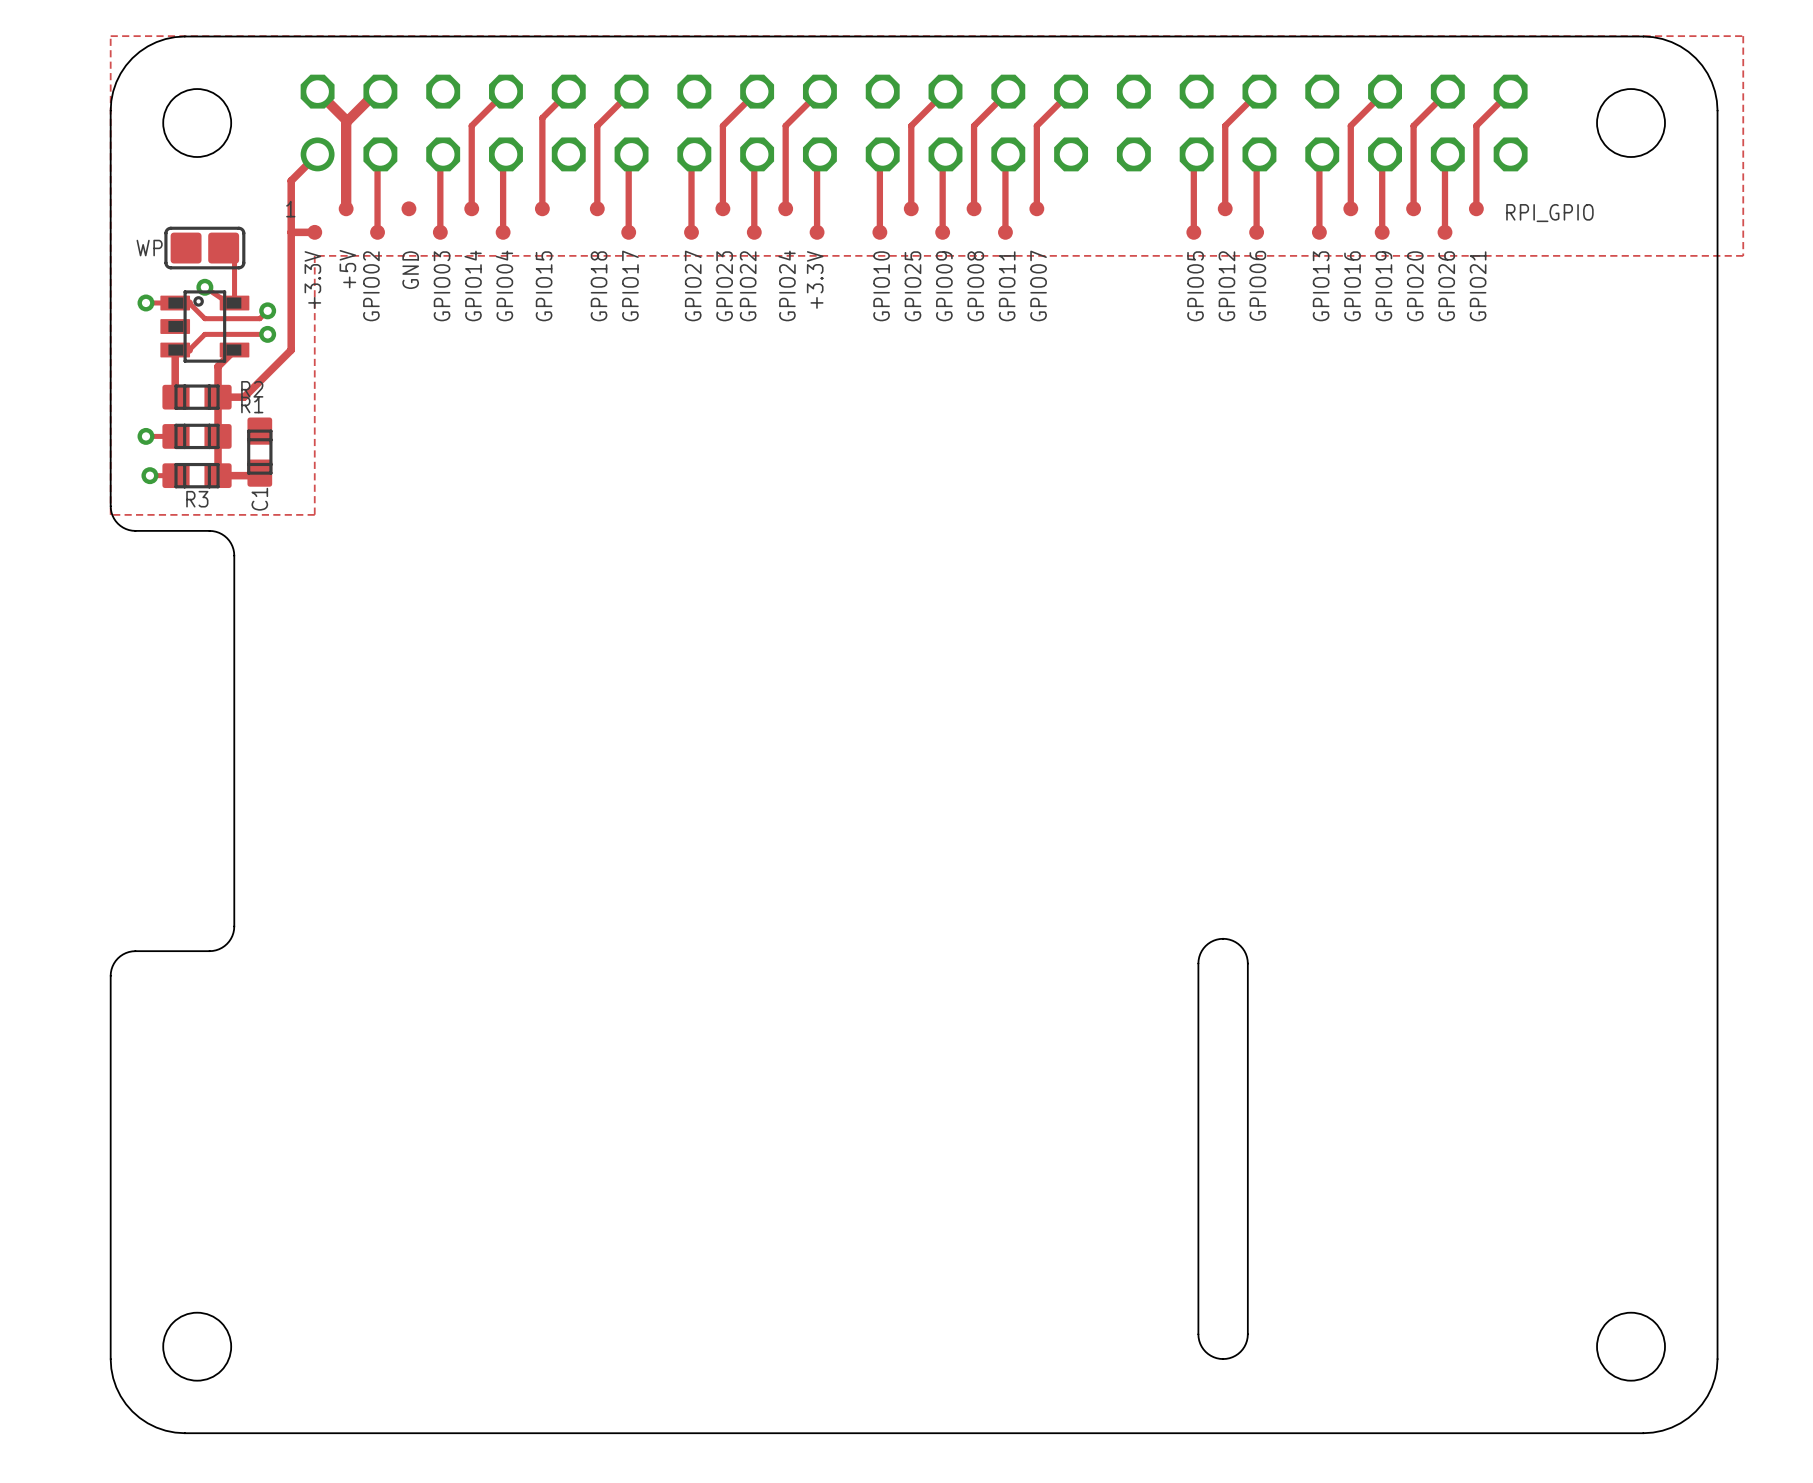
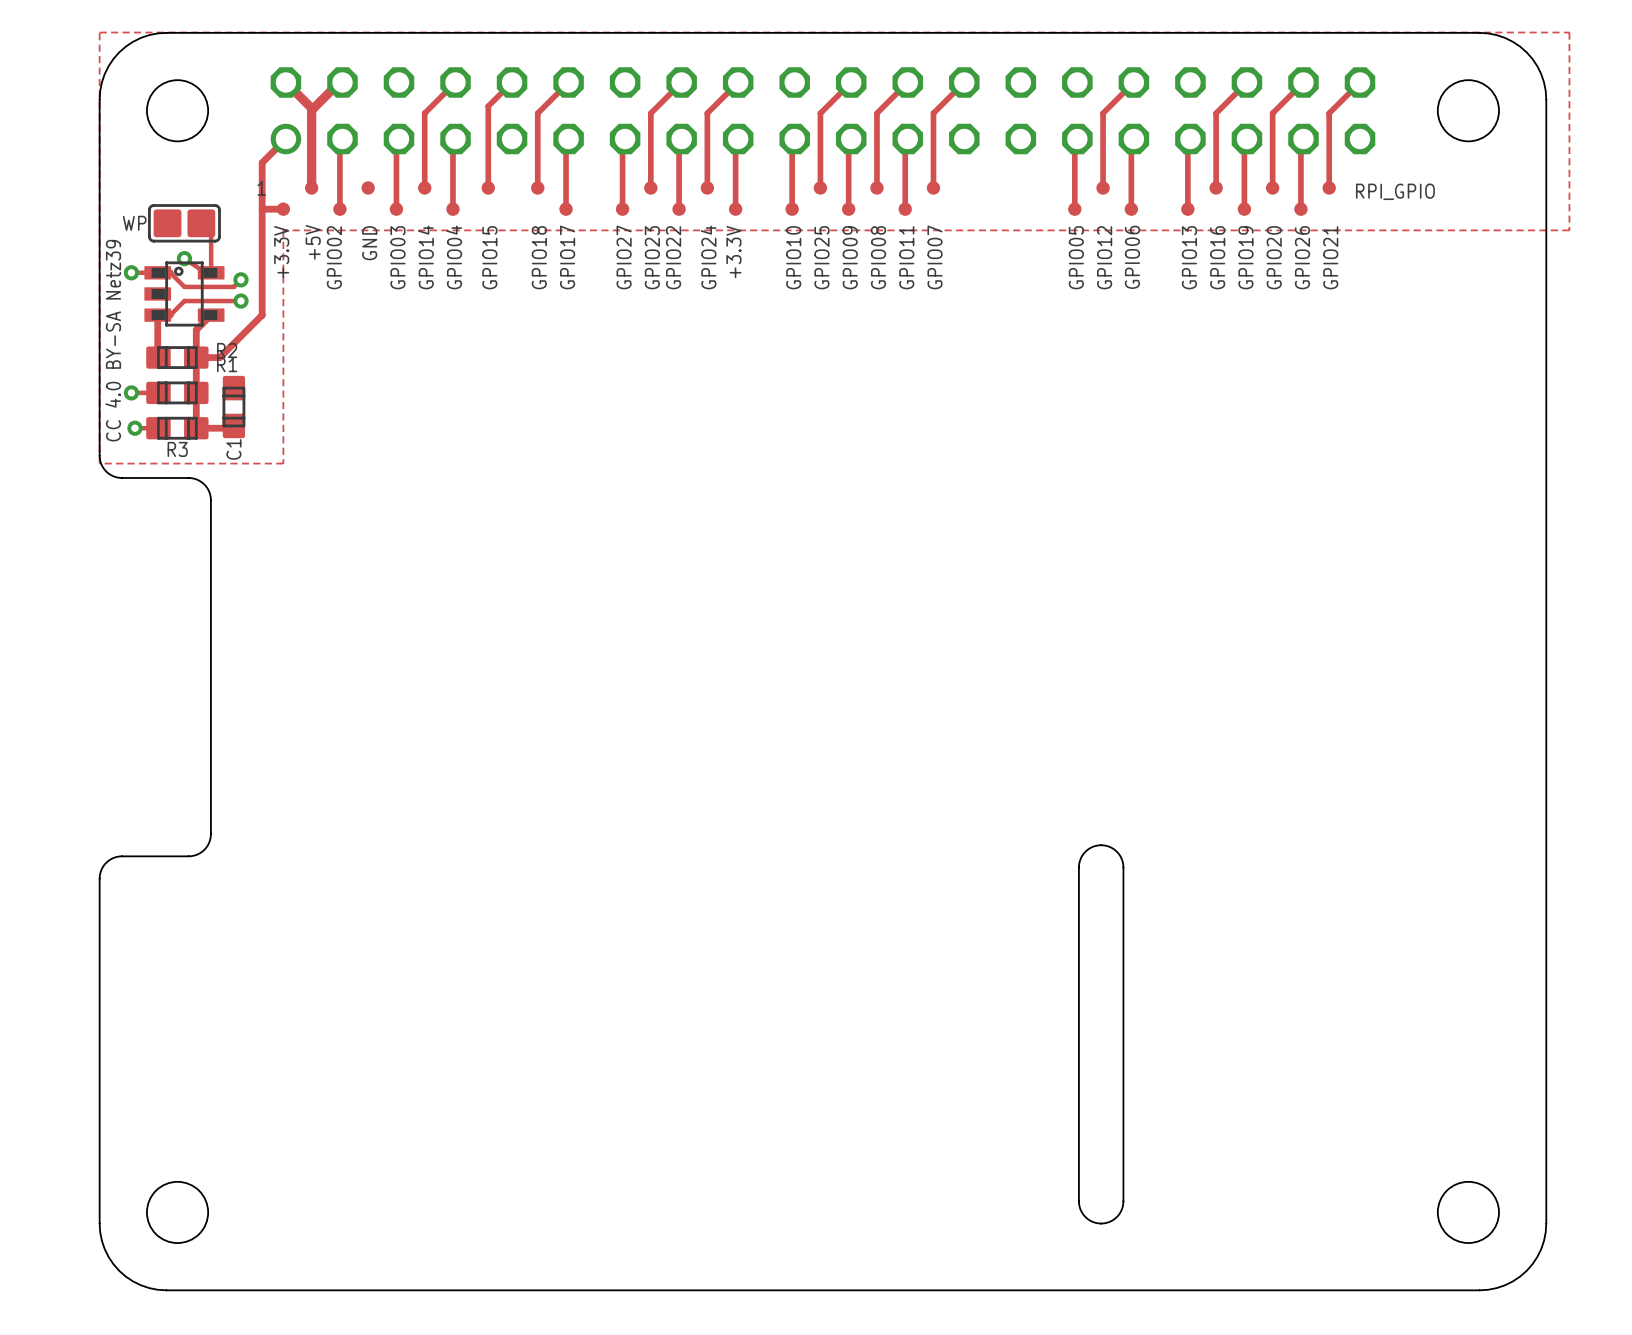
text: none -> CC 4.0 BY-SA Netz39 (113, 340)

